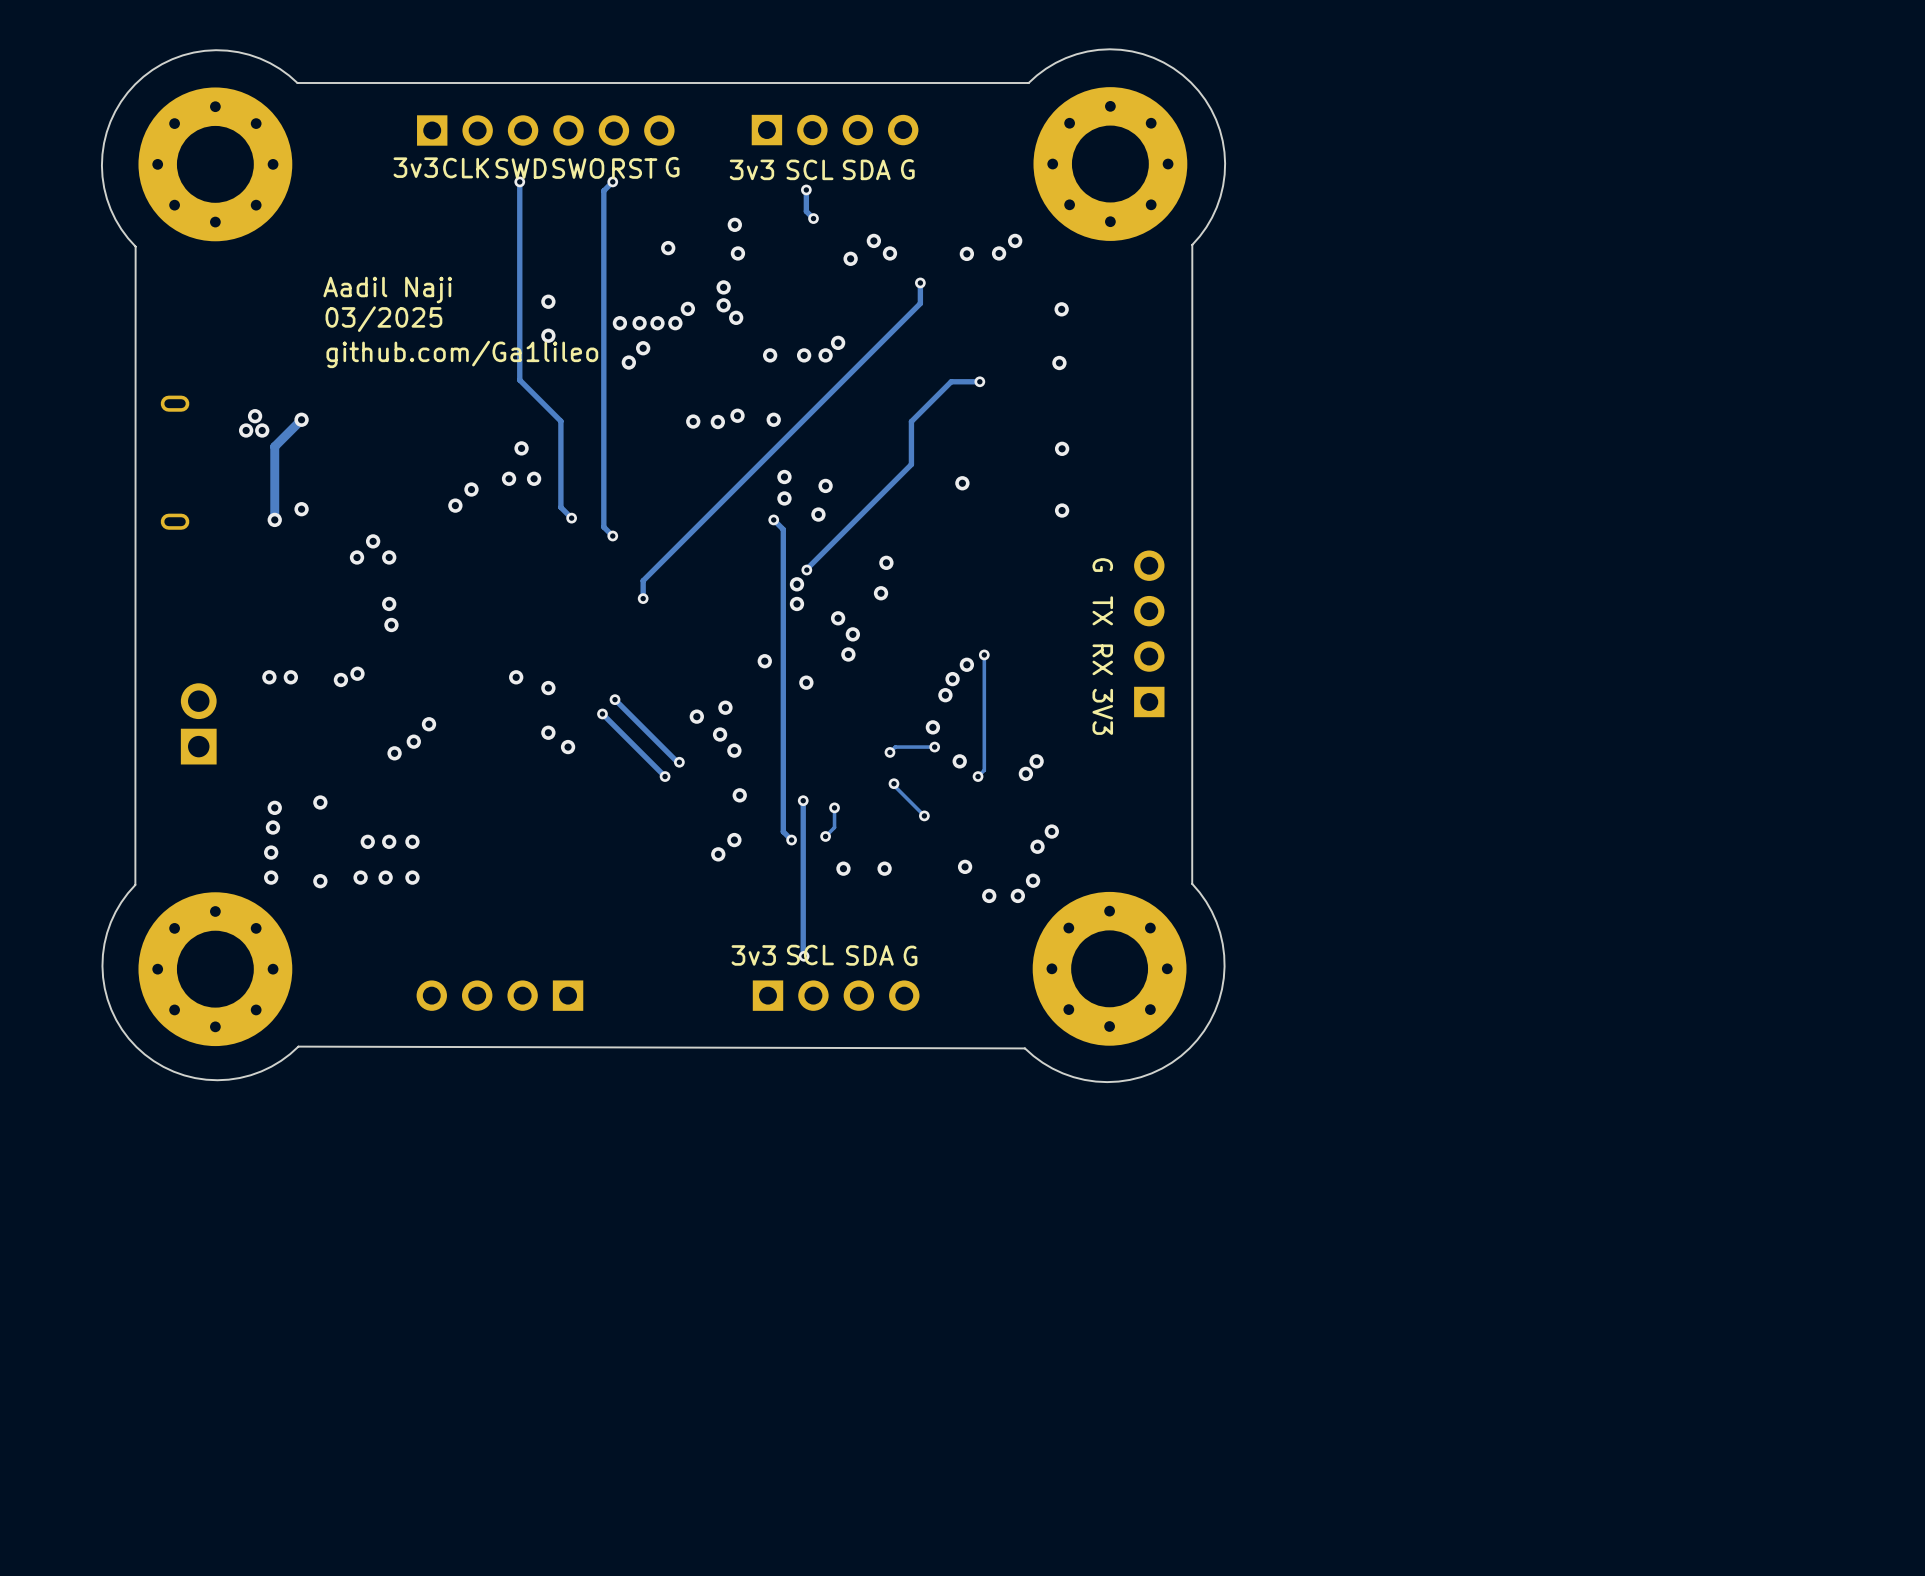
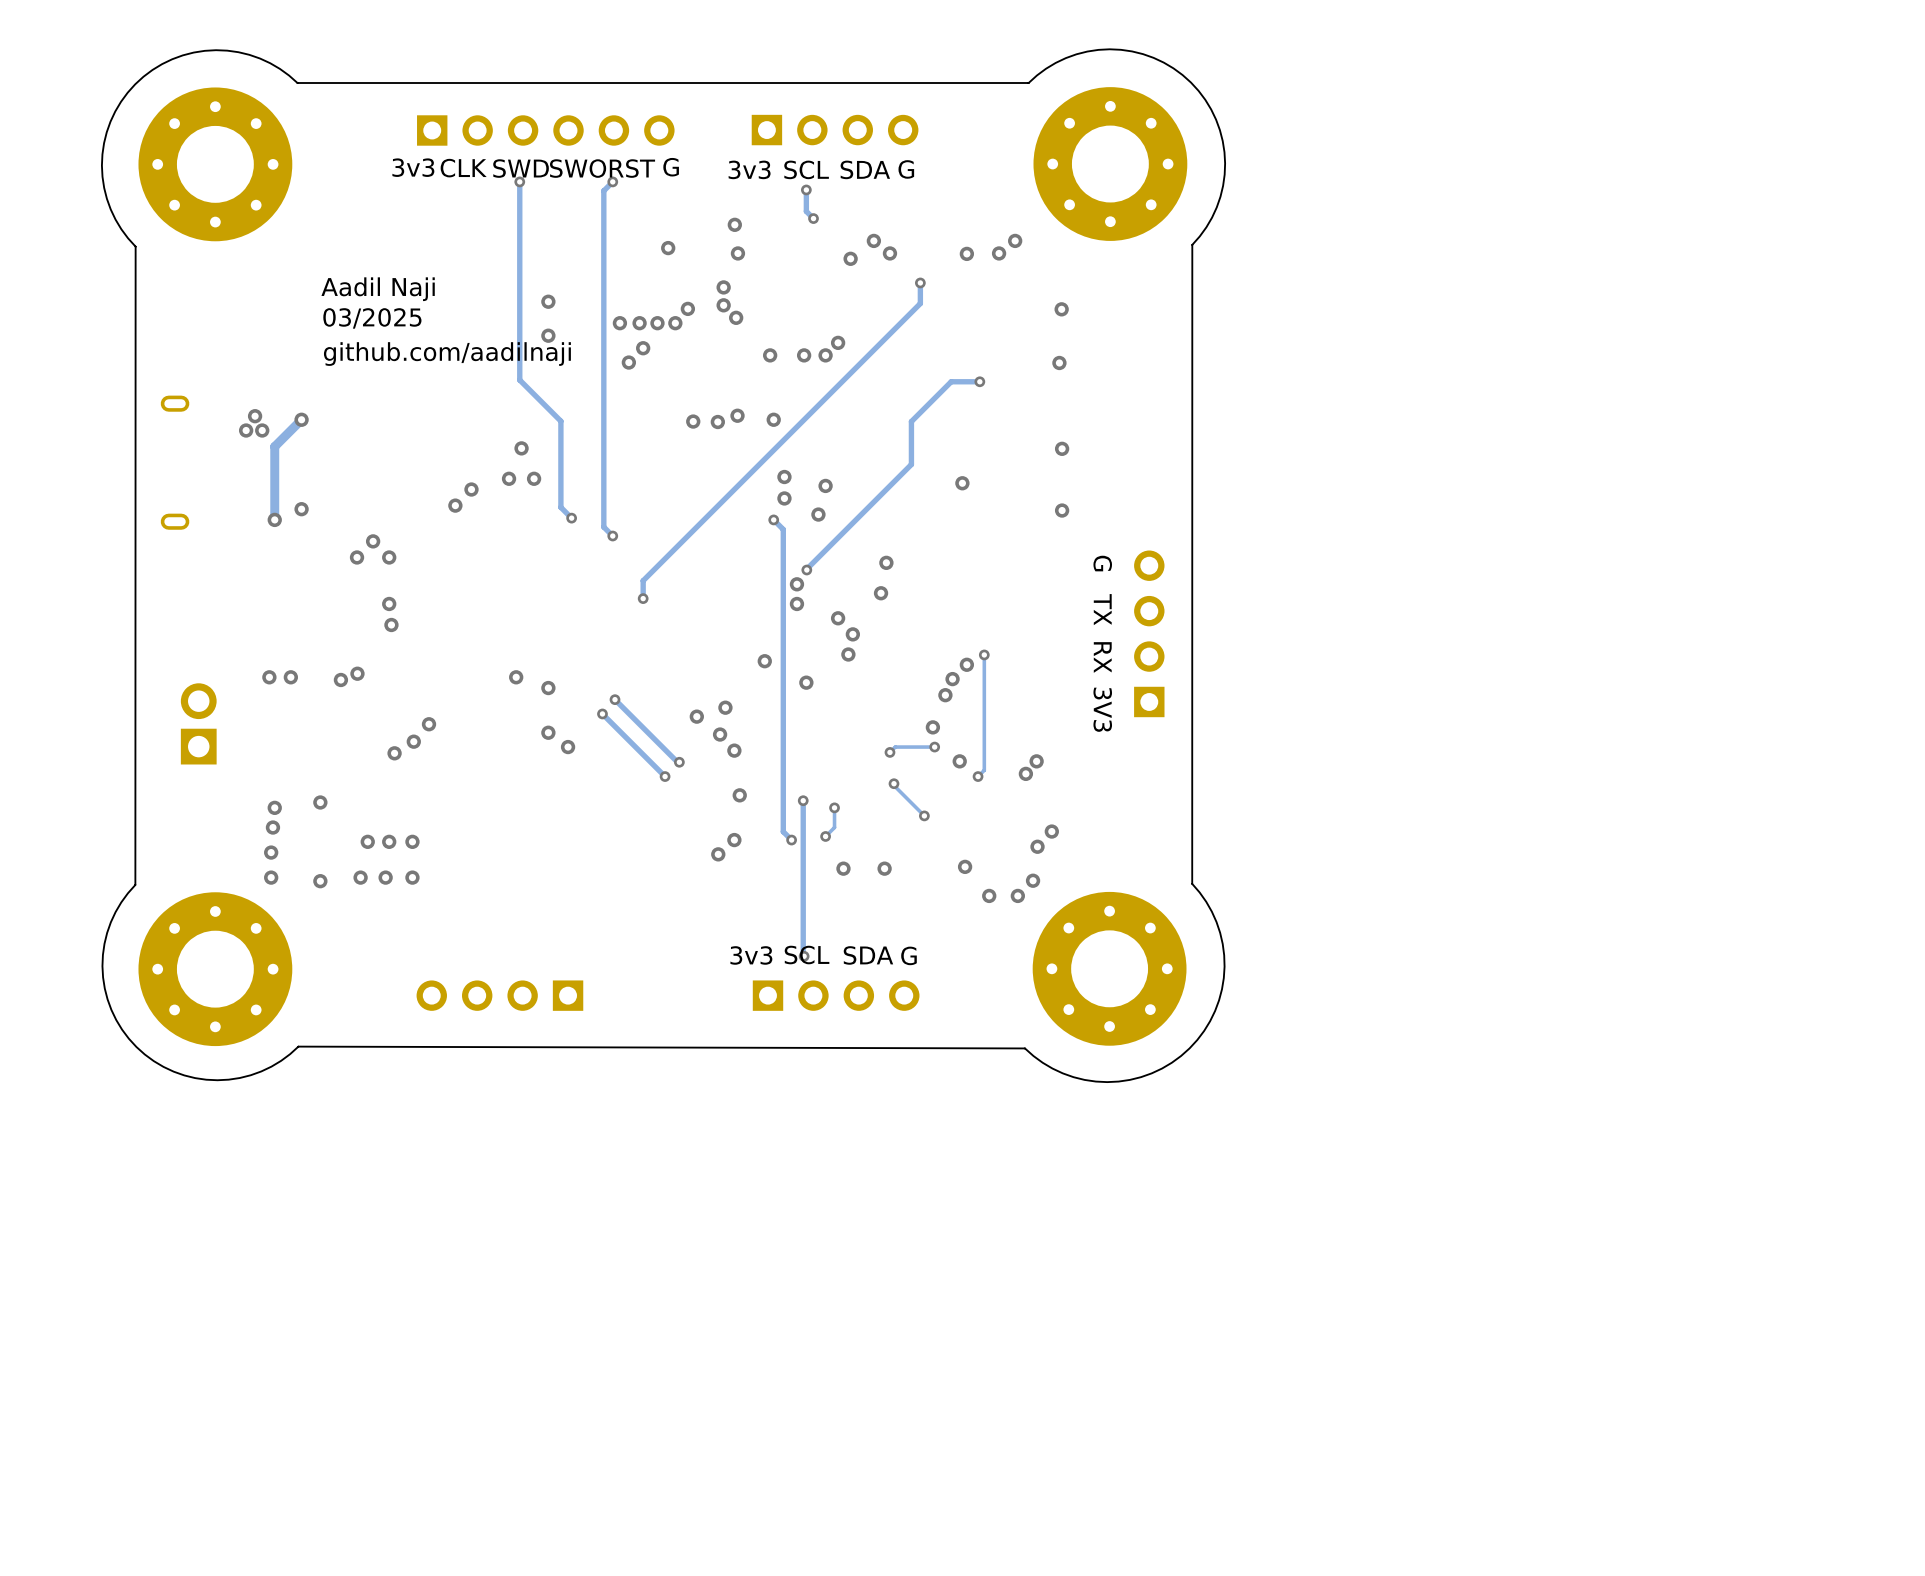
text: github.com/Ga1lileo (462, 354) -> github.com/aadilnaji (447, 354)

